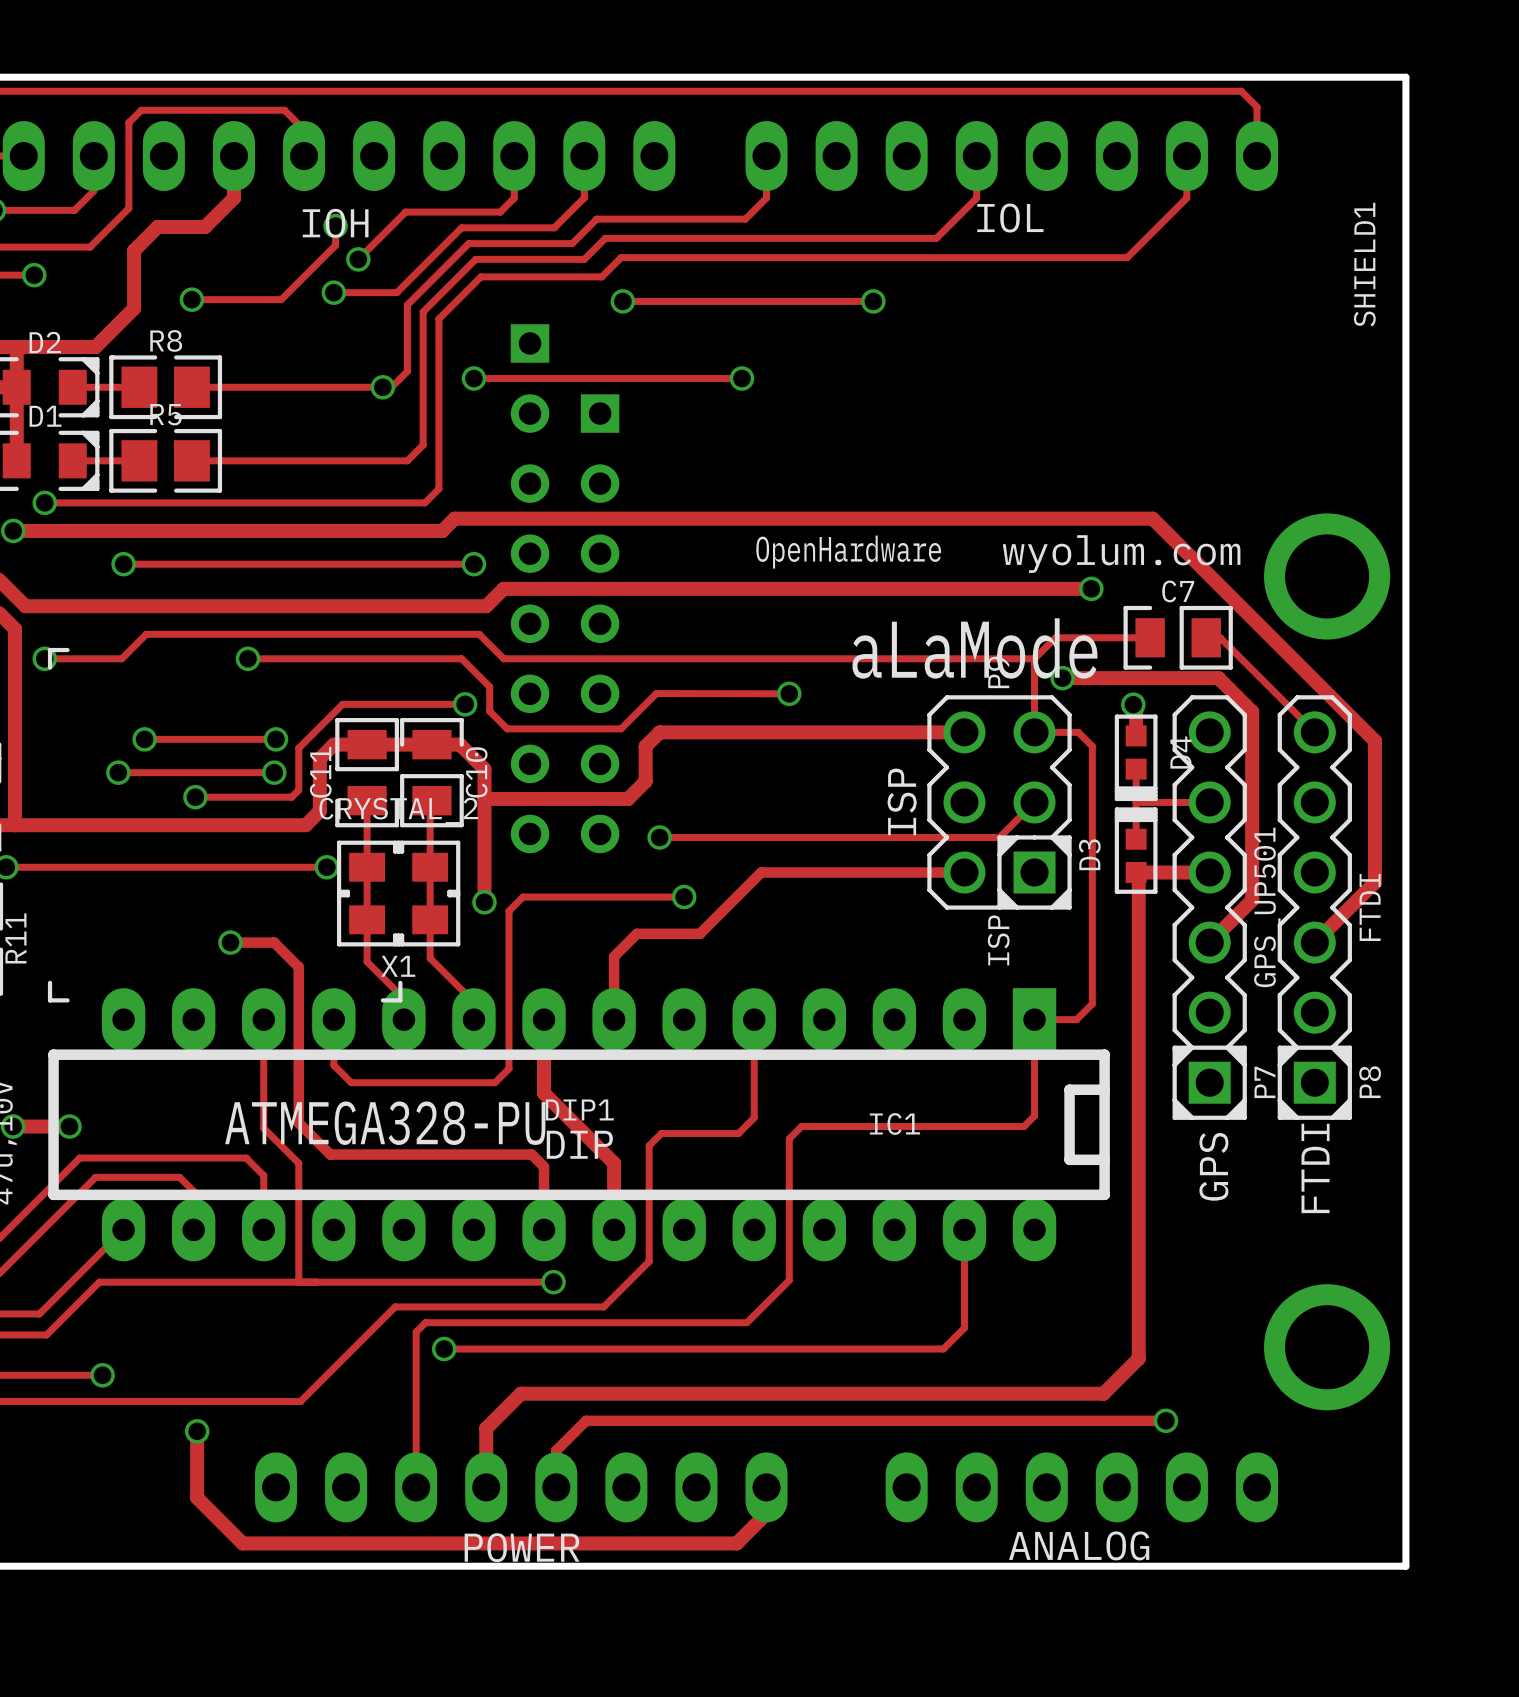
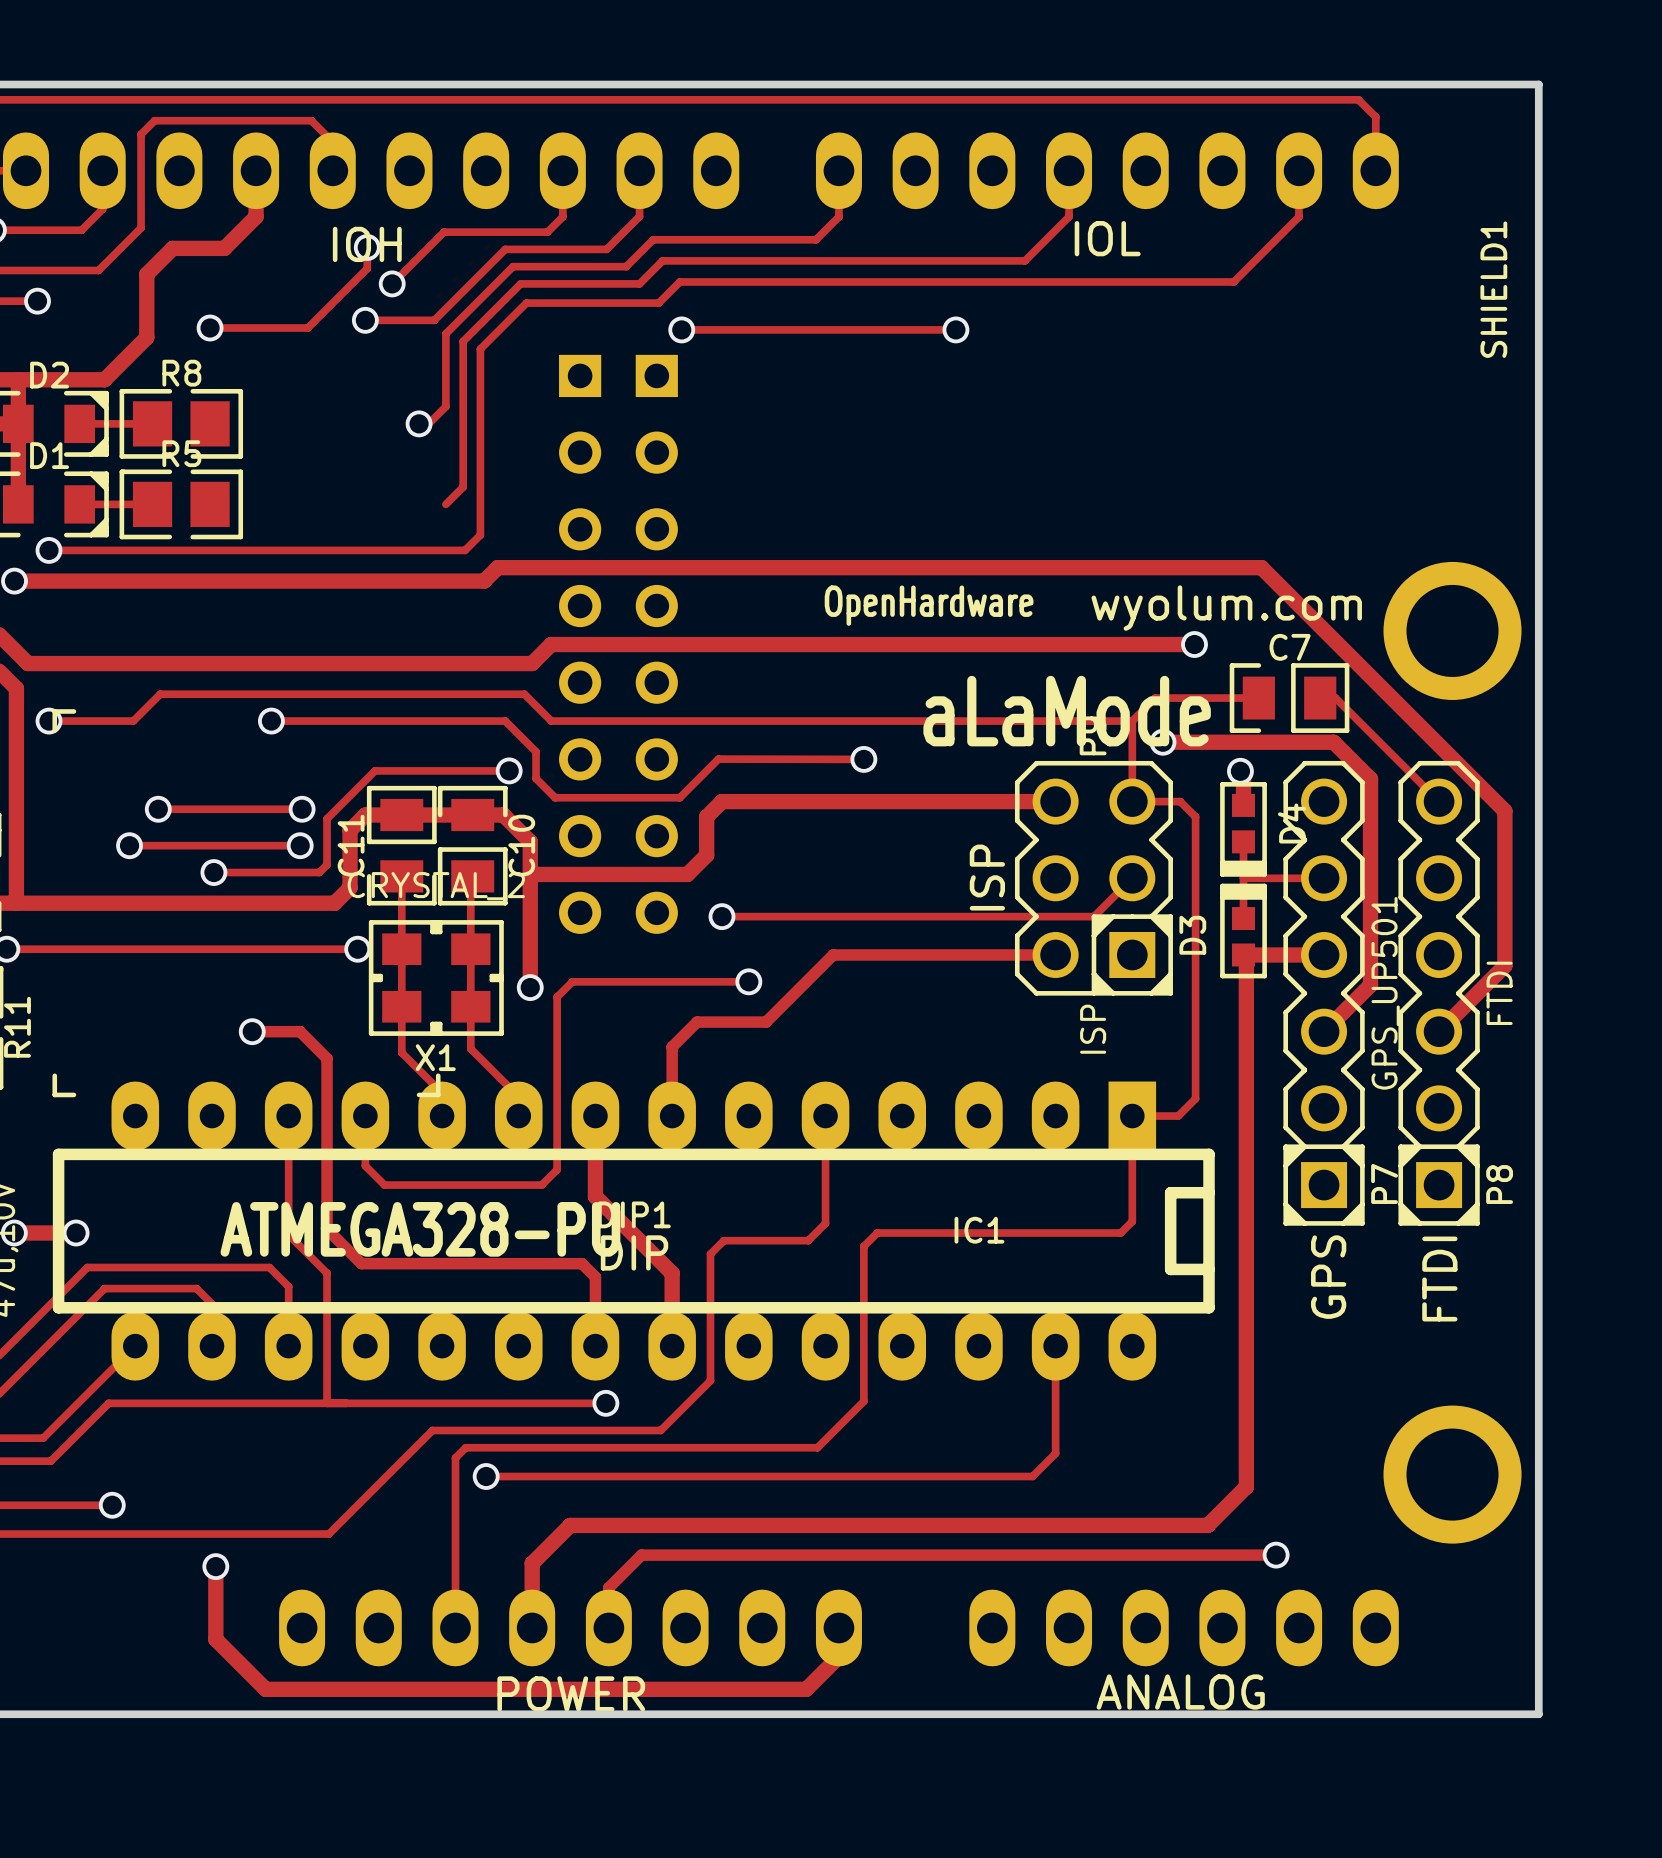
track: (473, 378) (741, 378) -> none
via: (473, 378) -> none
via: (741, 378) -> none
track: (191, 387) (382, 387) -> none
track: (191, 460) (407, 460) -> none
track: (123, 564) (473, 564) -> none
via: (123, 564) -> none
via: (473, 564) -> none
part: none -> (656, 644)
part: (600, 623) -> none

